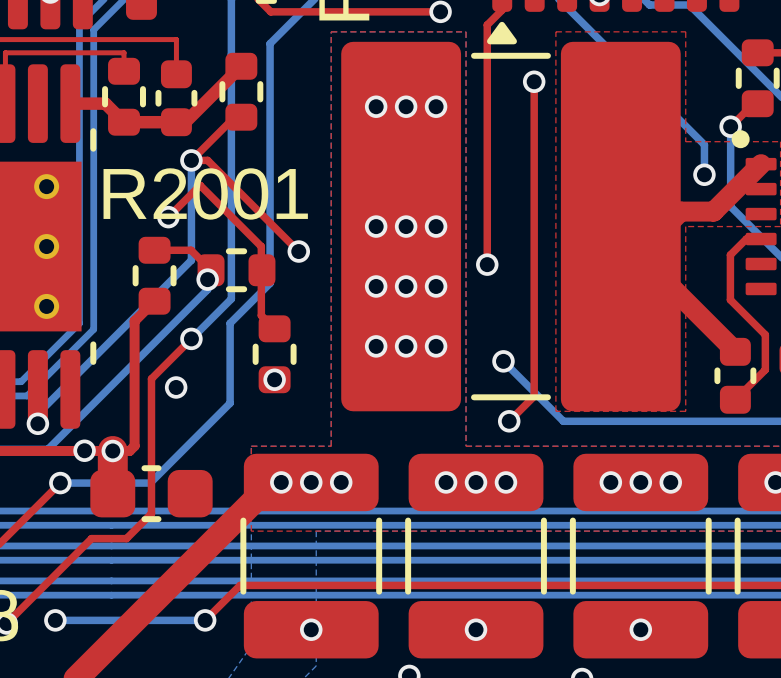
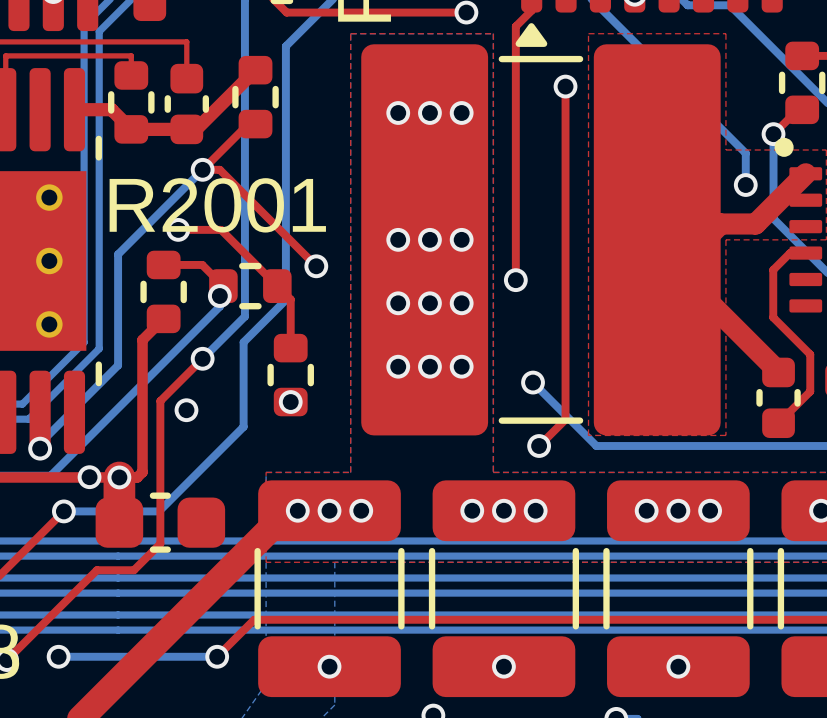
bottom track: (191, 160) (191, 260) (39, 412) (41, 415) -> (202, 169) (118, 254) (118, 365) (40, 443) (40, 448)
top track: (168, 217) (200, 185) (261, 246) (261, 315) (274, 328) -> (178, 229) (221, 229) (290, 299) (290, 348)

